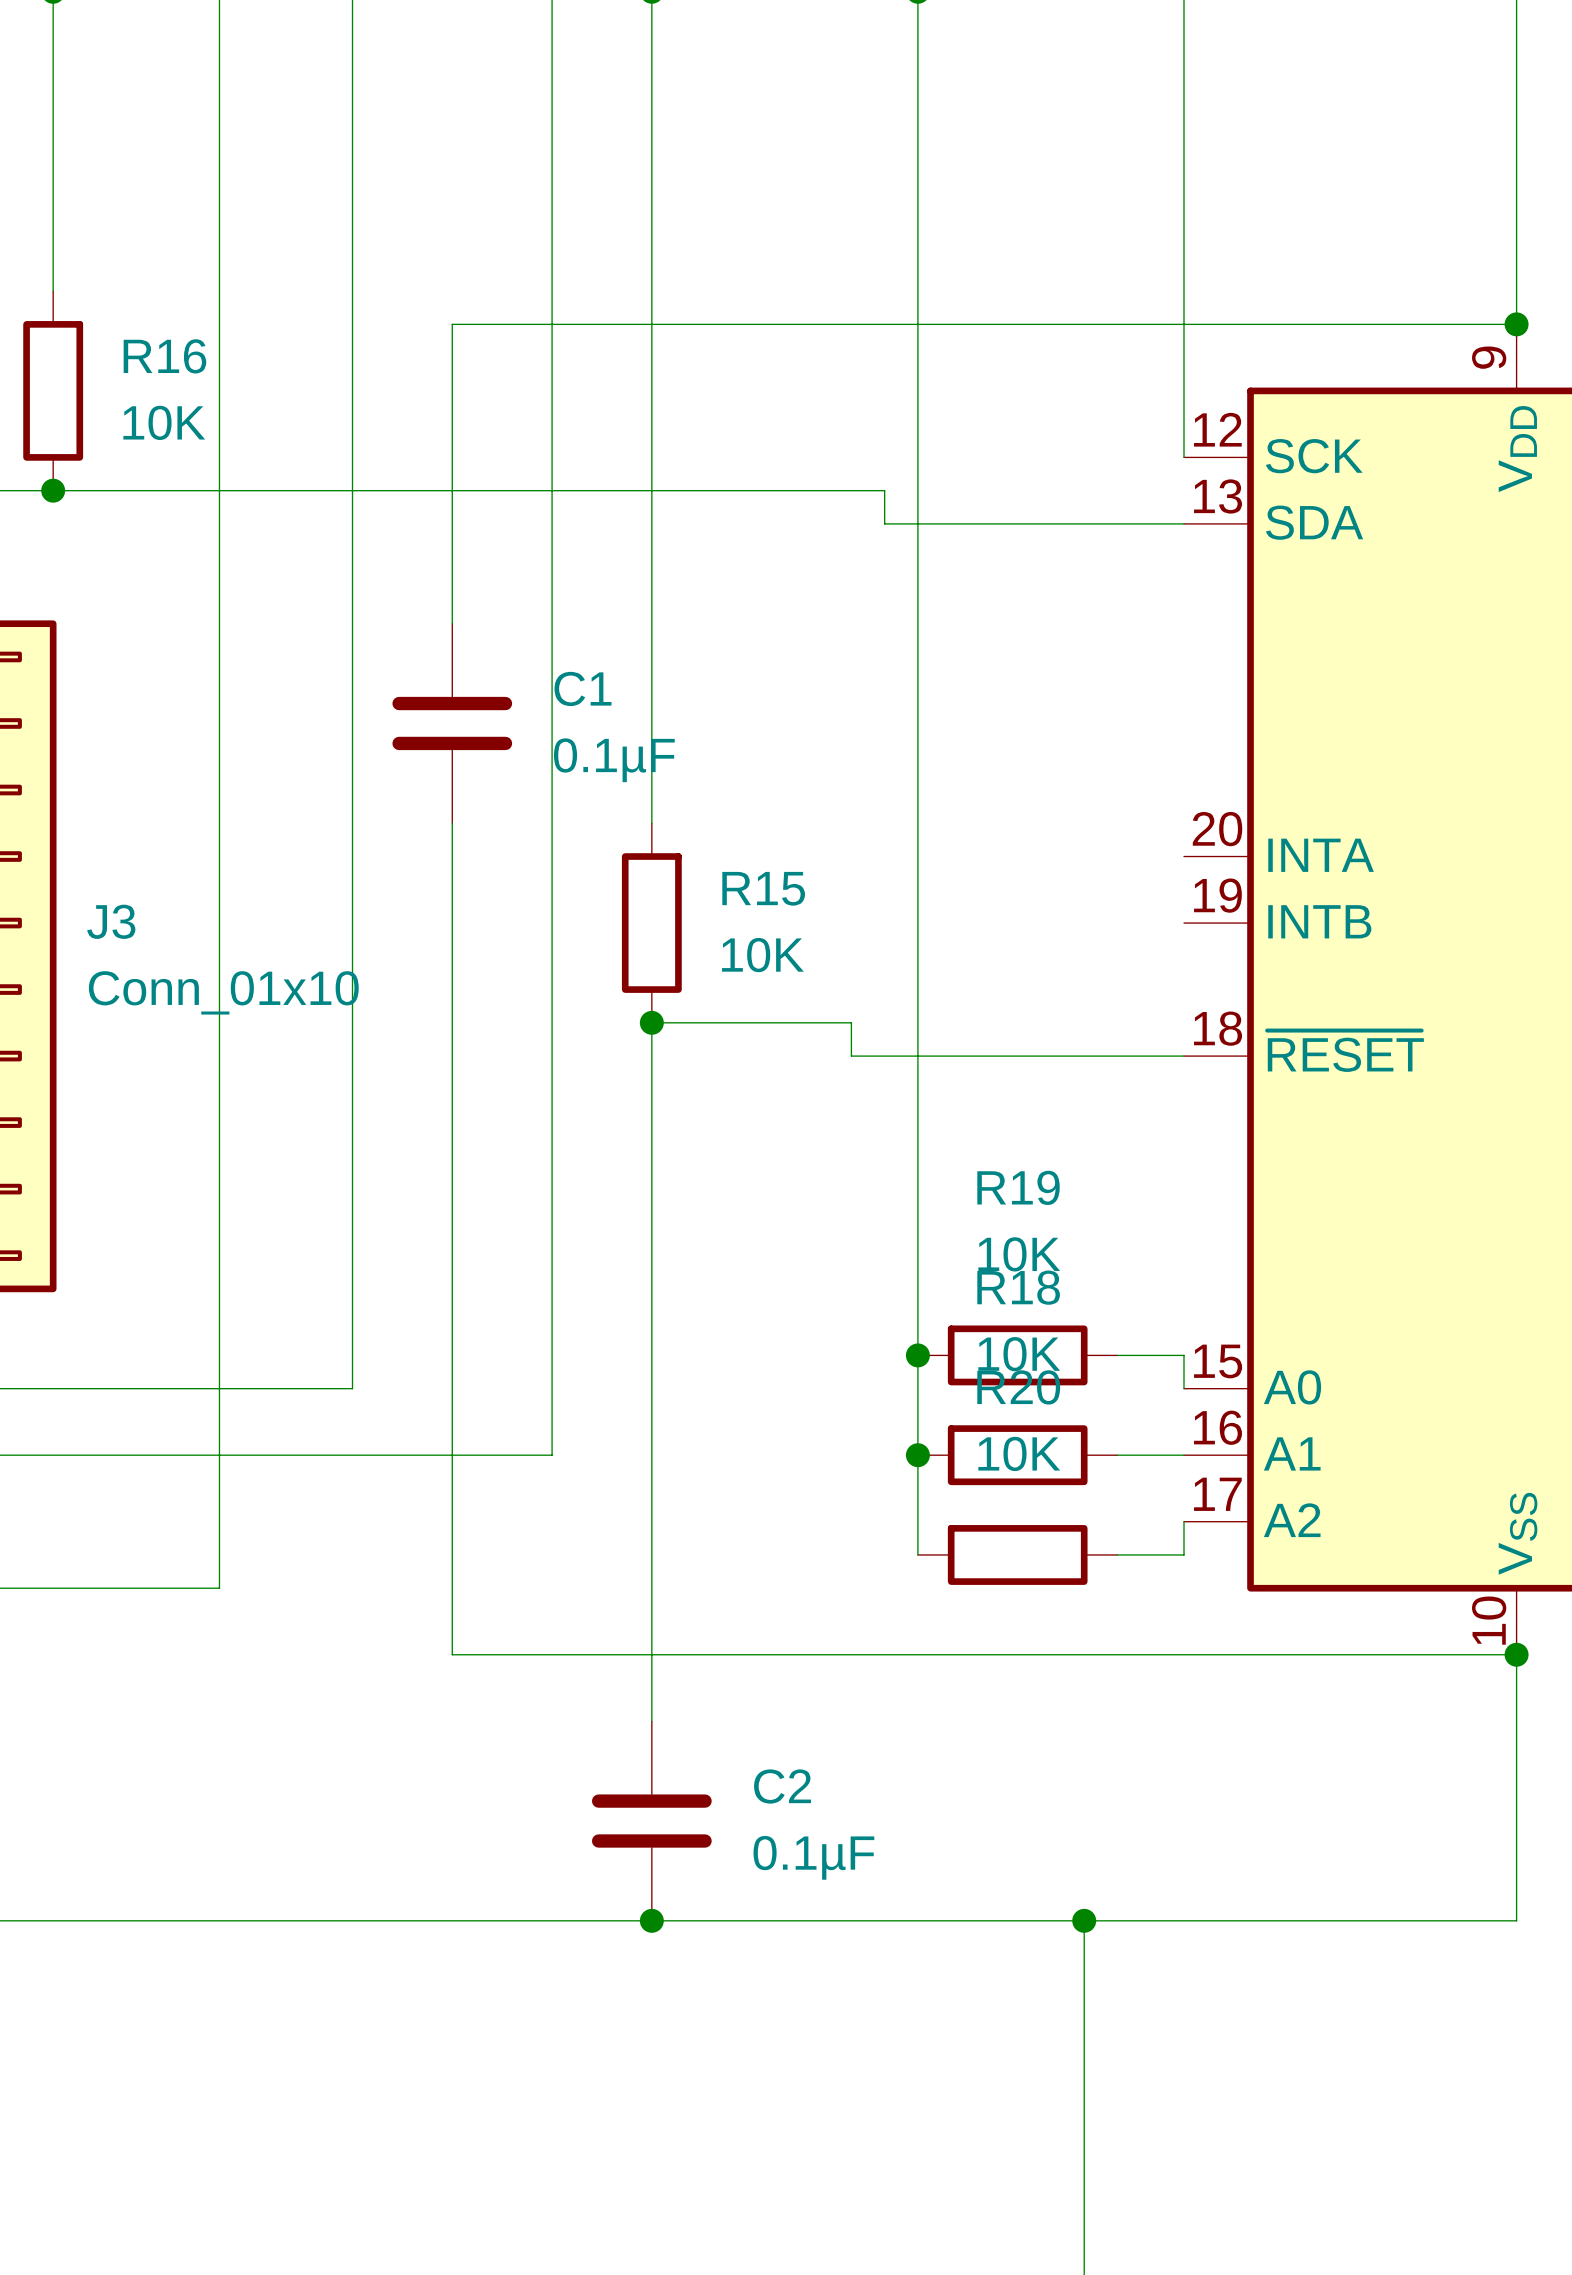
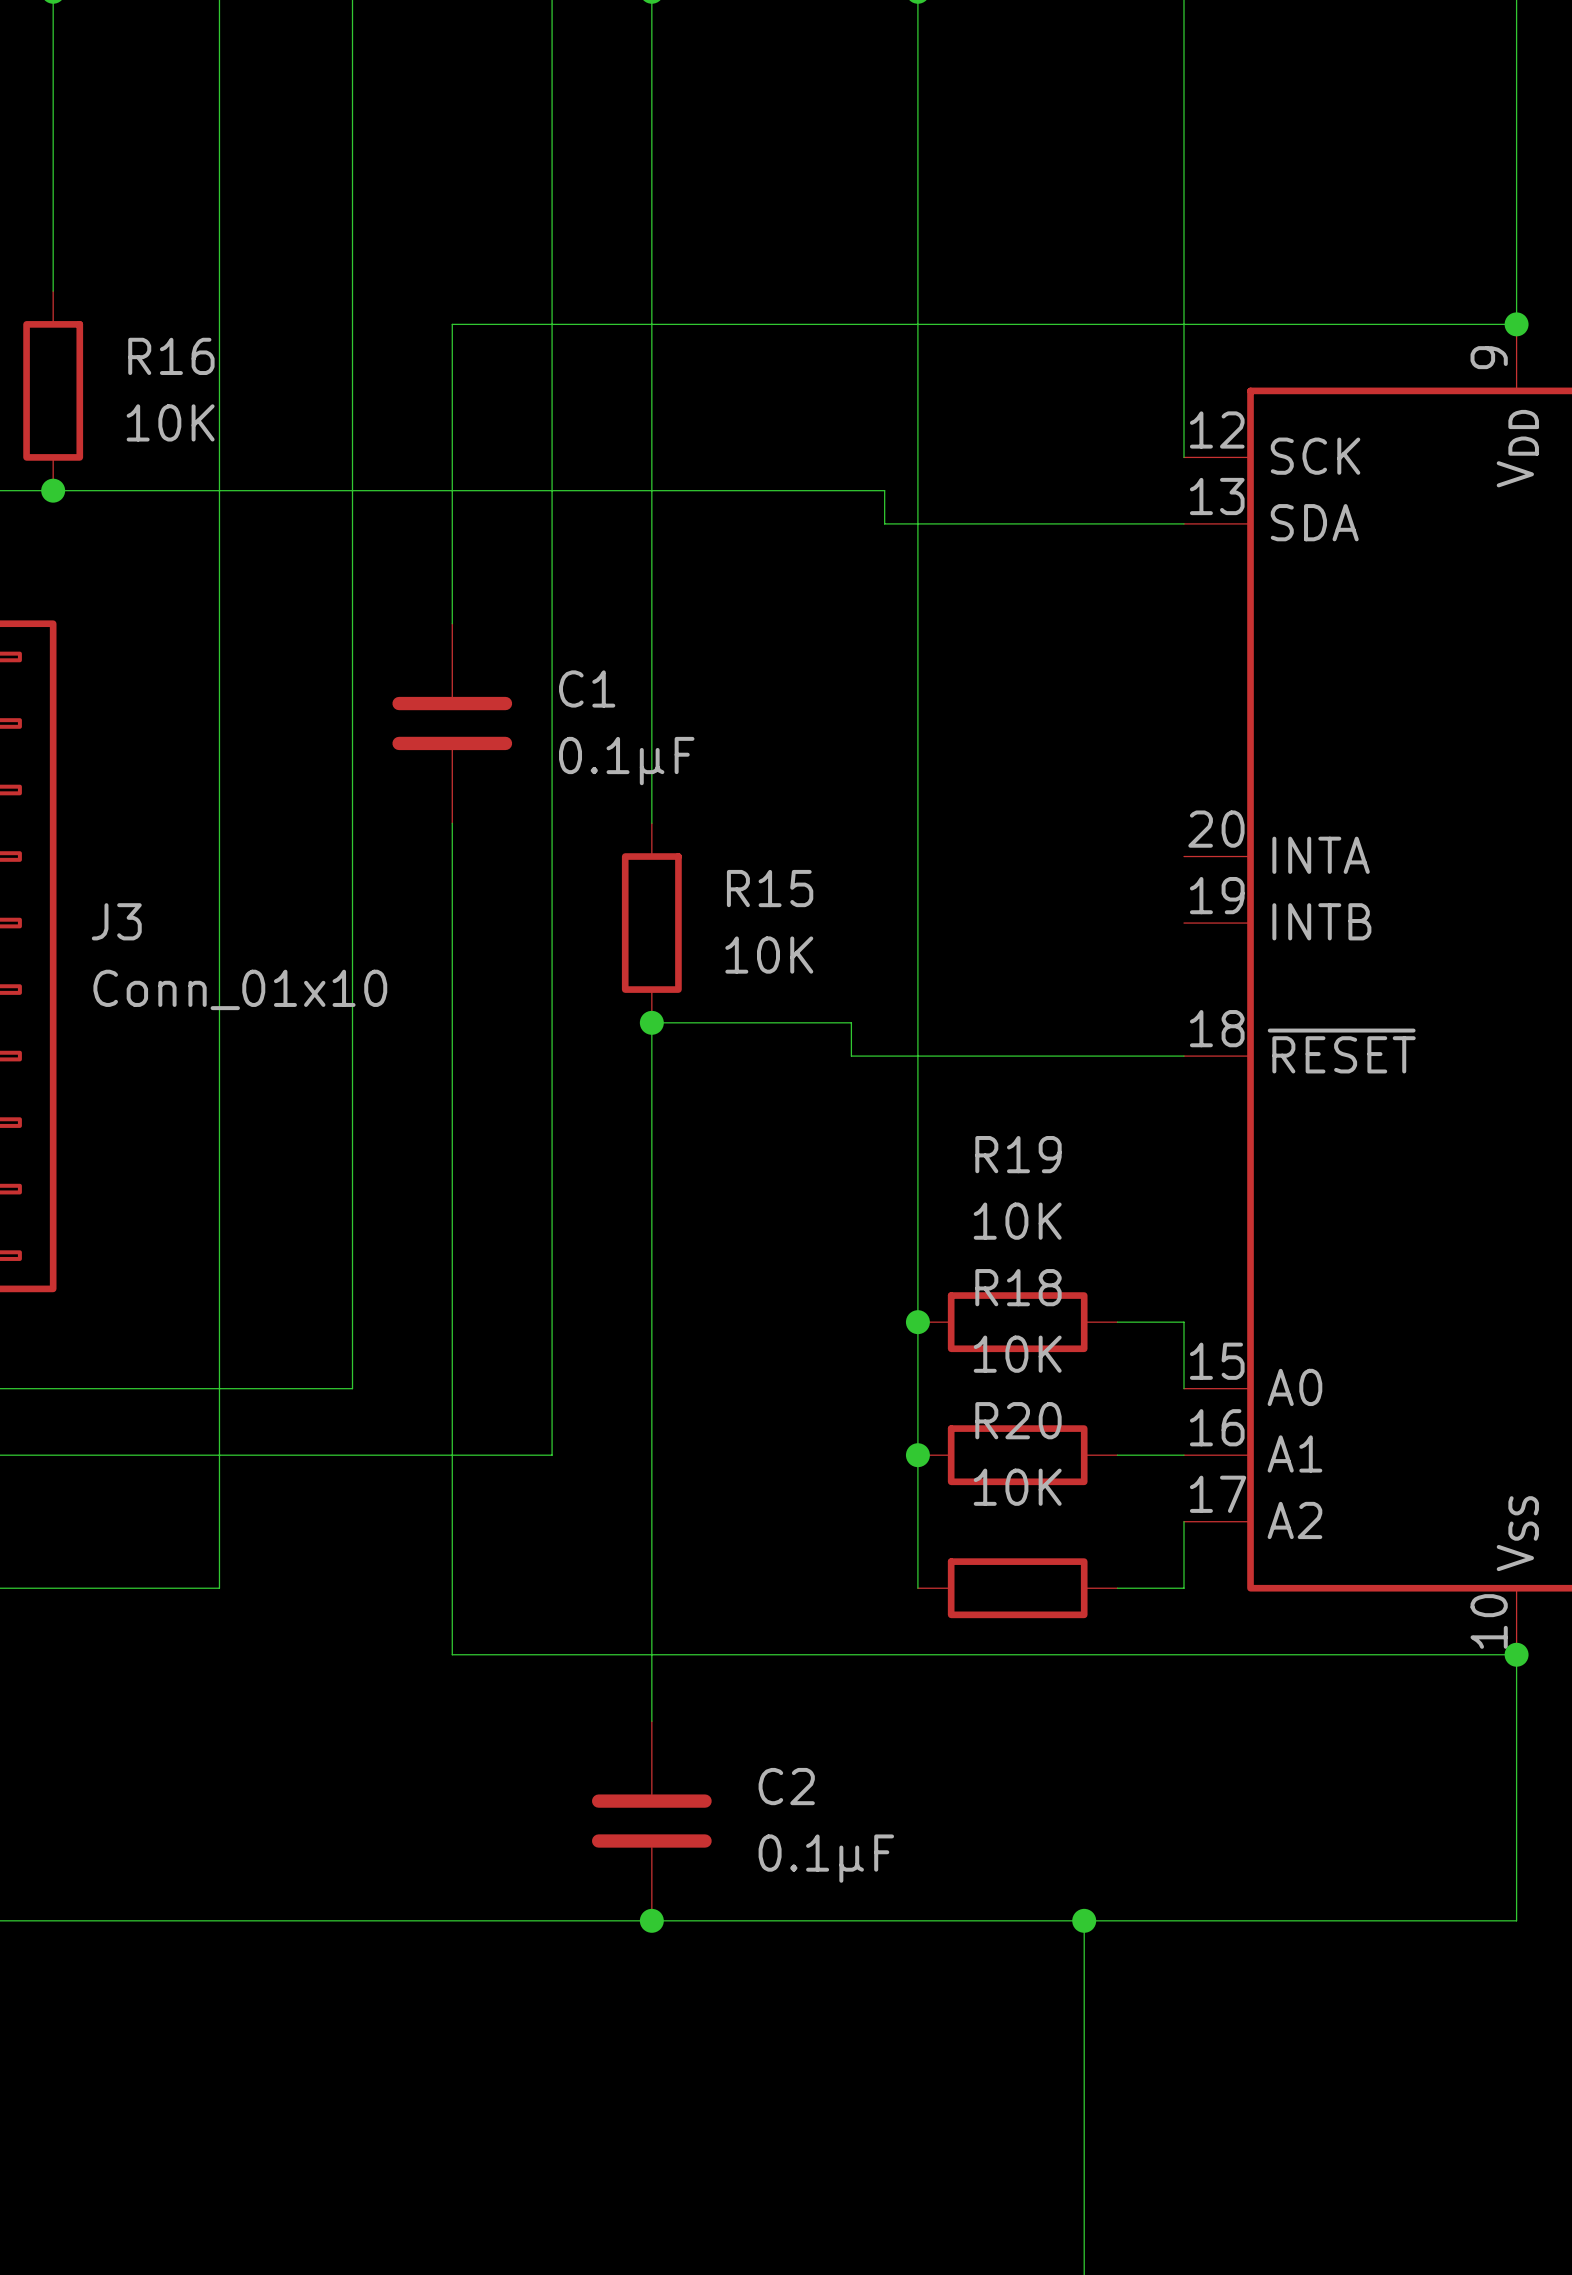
junction position: (917, 1355) -> (917, 1322)
R19 position: (1017, 1355) -> (1017, 1322)
wire: (1117, 1355) (1183, 1355) -> (1117, 1322) (1183, 1322) (1183, 1355)
wire: none -> (917, 1554) (917, 1588)
R20 position: (1017, 1554) -> (1017, 1588)
wire: (1117, 1554) (1183, 1554) -> (1117, 1588) (1183, 1588) (1183, 1554)

